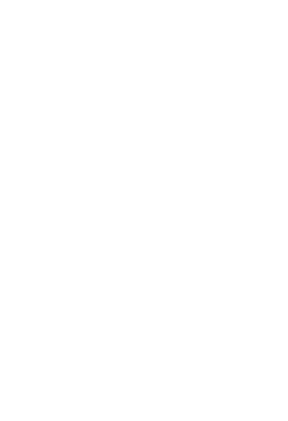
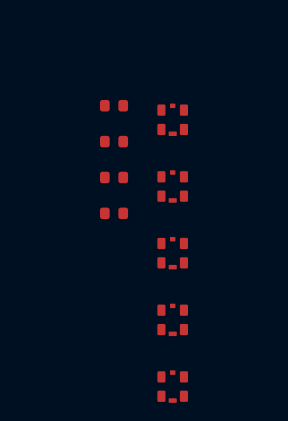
part: none -> (114, 105)
part: none -> (172, 119)
part: none -> (114, 141)
part: none -> (114, 177)
part: none -> (172, 186)
part: none -> (114, 213)
part: none -> (172, 253)
part: none -> (172, 319)
part: none -> (172, 386)

